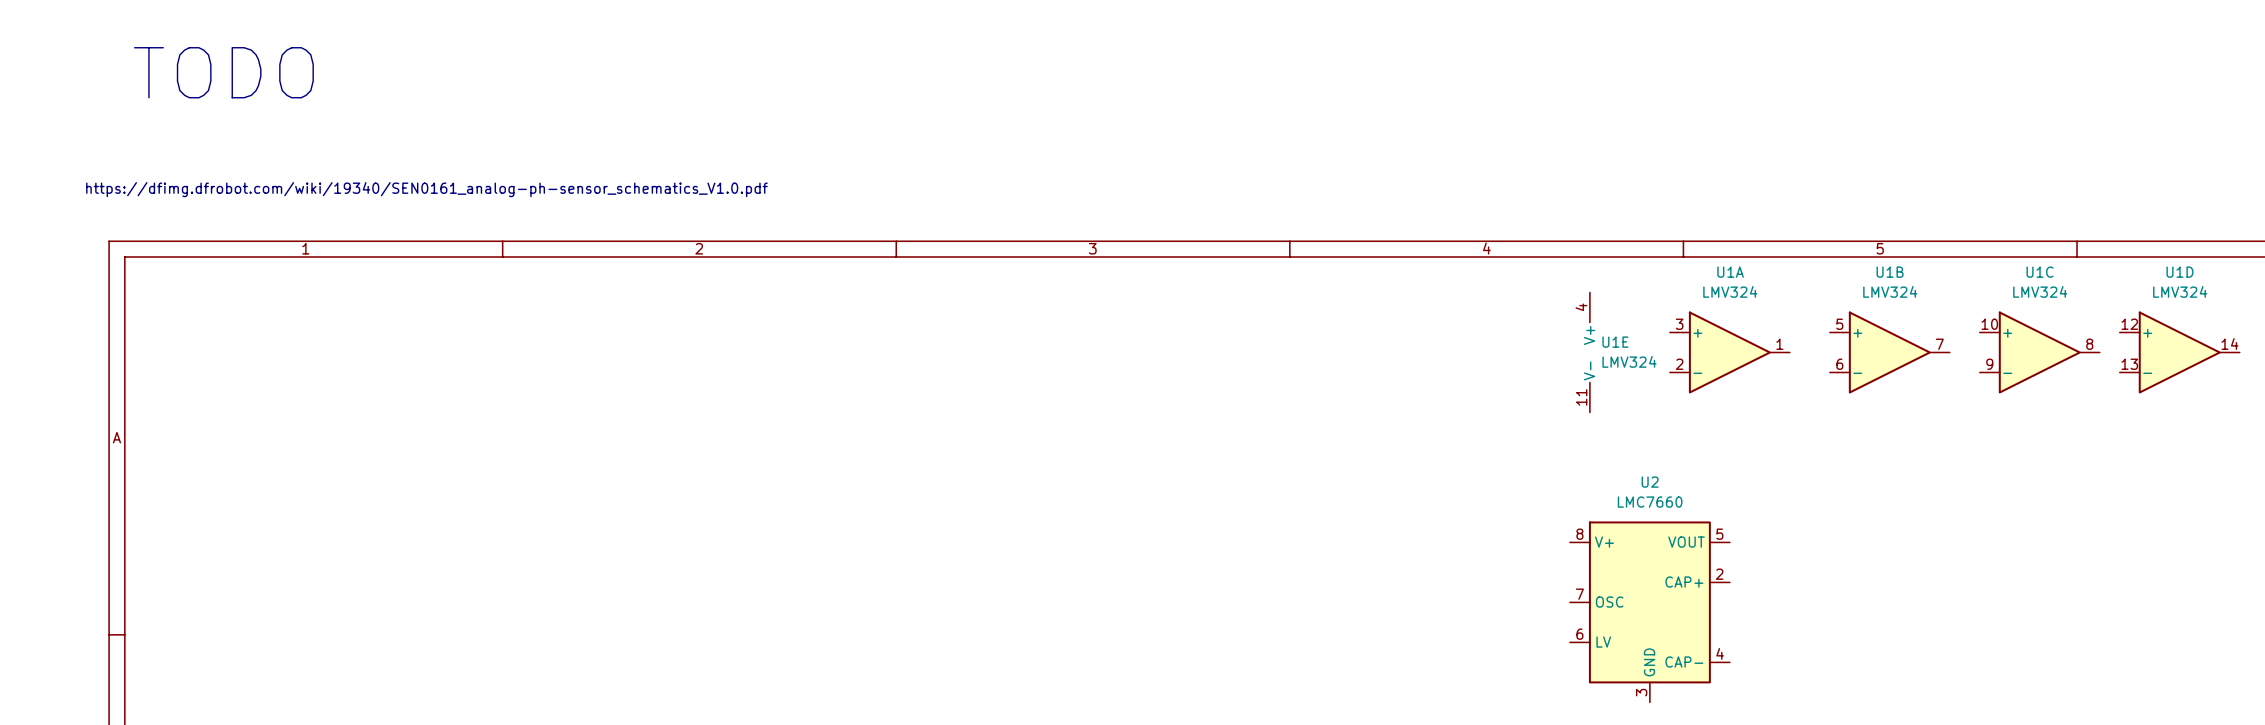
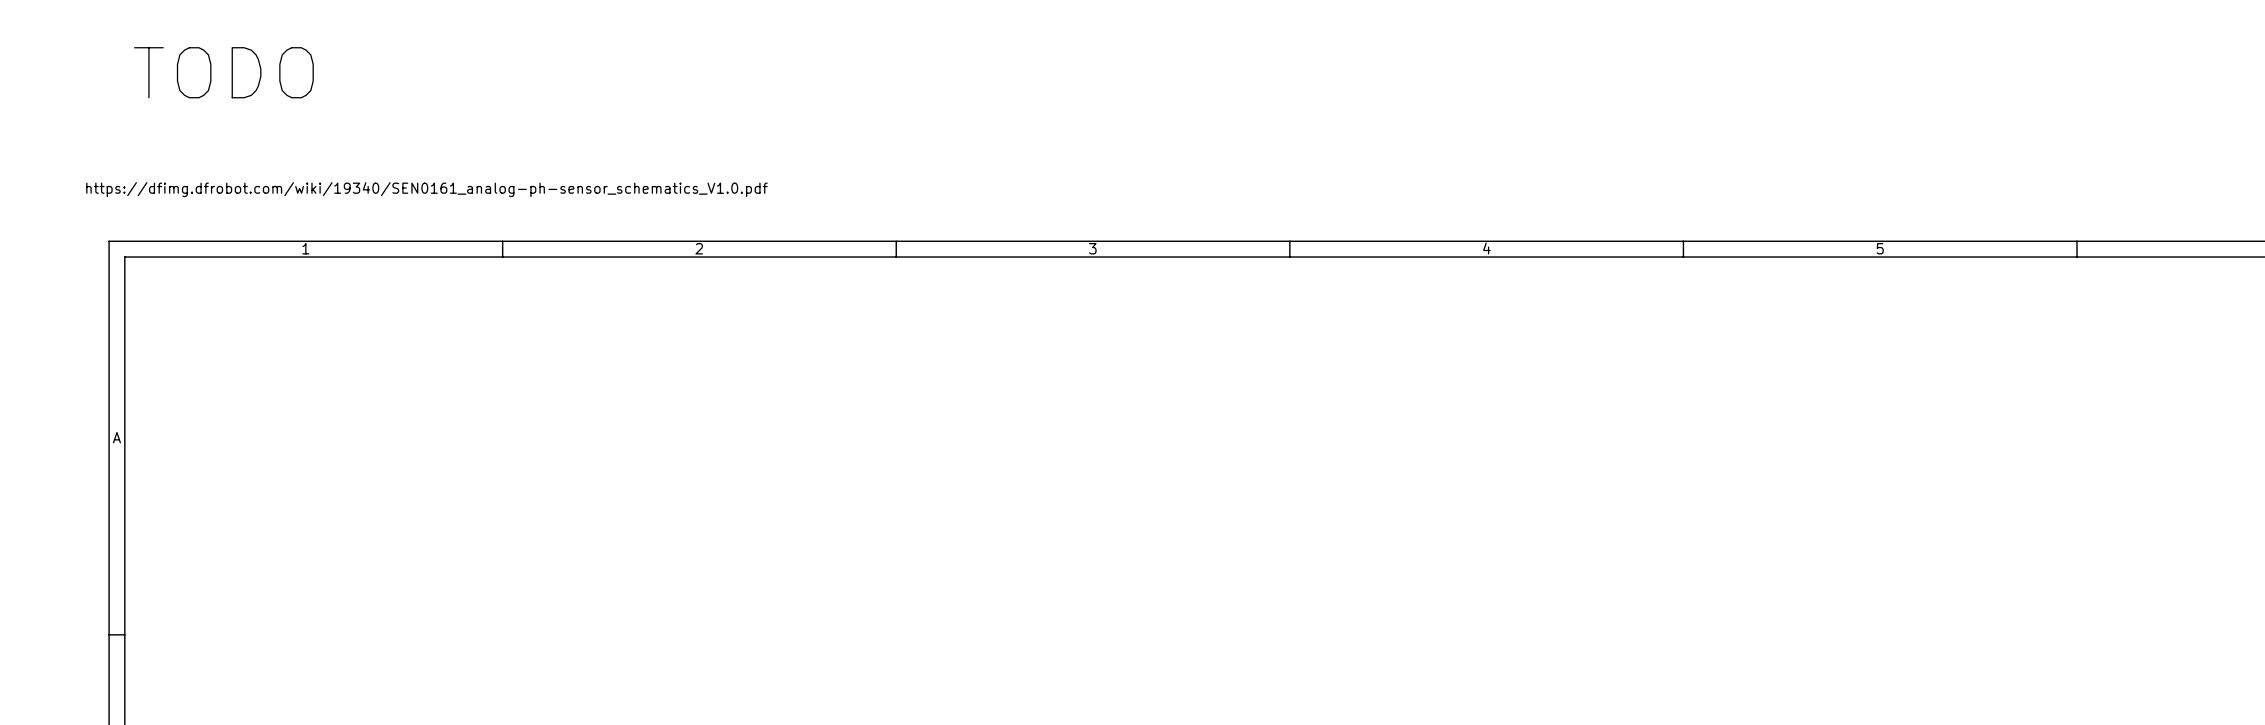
U1E: LMV324 (1589, 352) -> none
U1A: LMV324 (1729, 352) -> none
U1B: LMV324 (1889, 352) -> none
U1C: LMV324 (2039, 352) -> none
U1D: LMV324 (2179, 352) -> none
U2: LMC7660 (1649, 611) -> none

